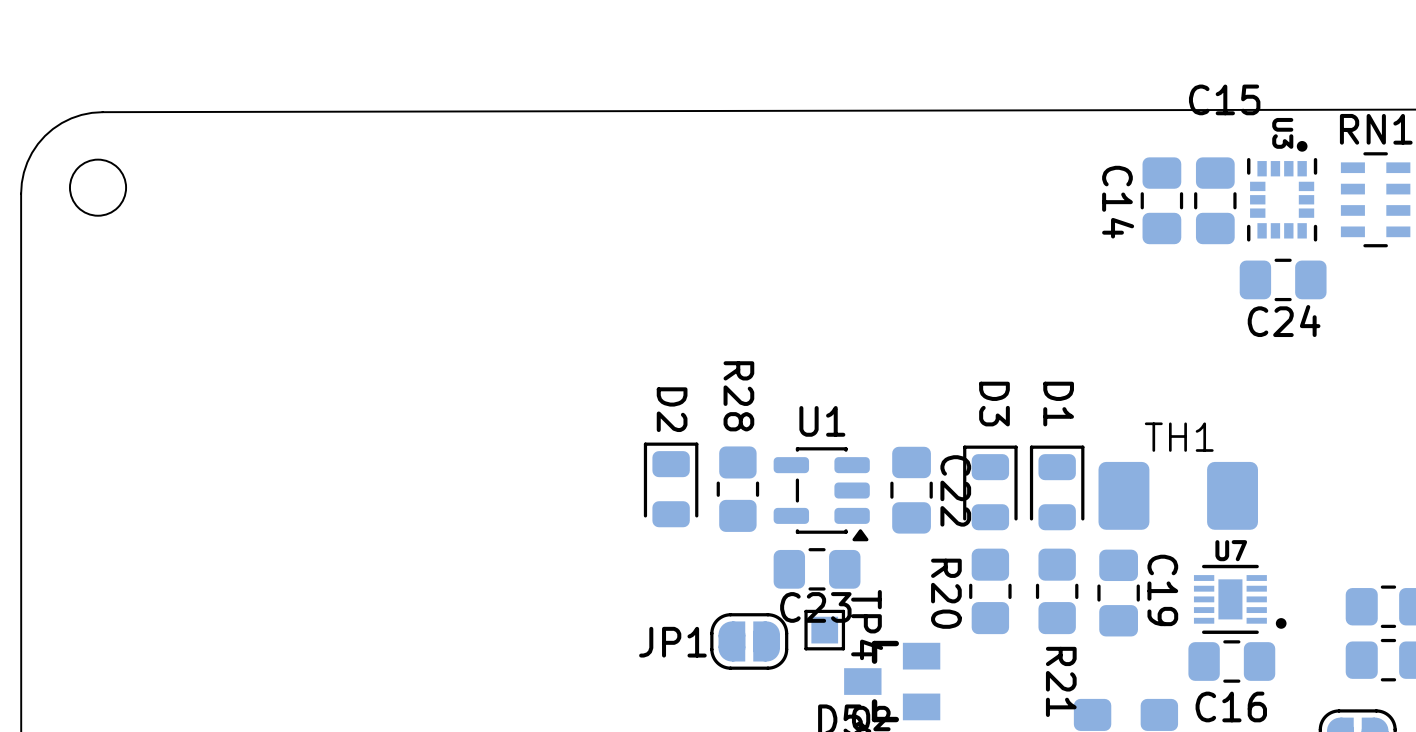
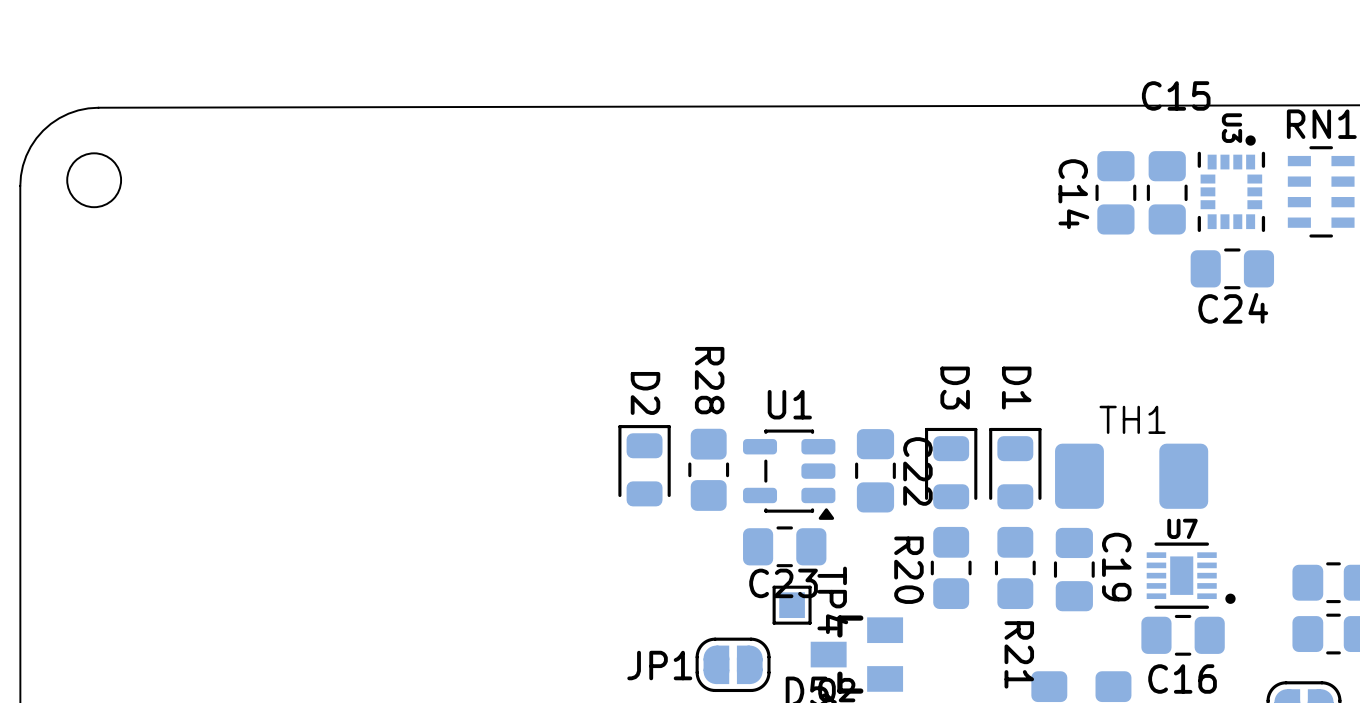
JP1 position: (749, 641) -> (733, 664)

